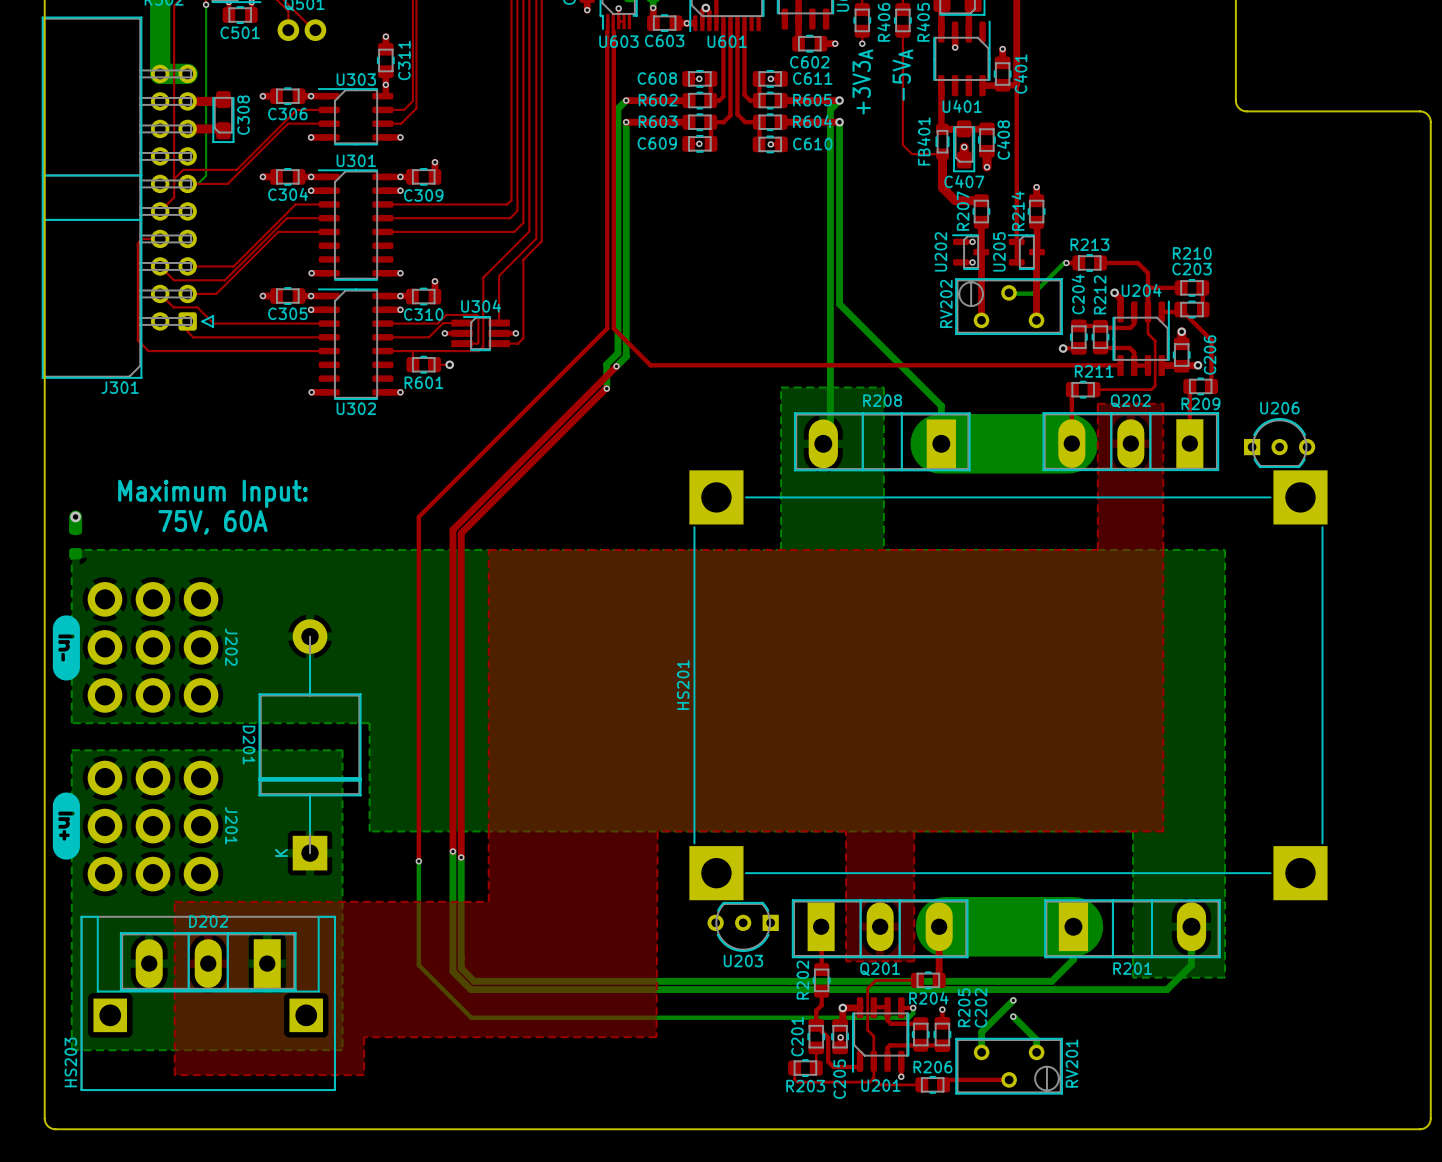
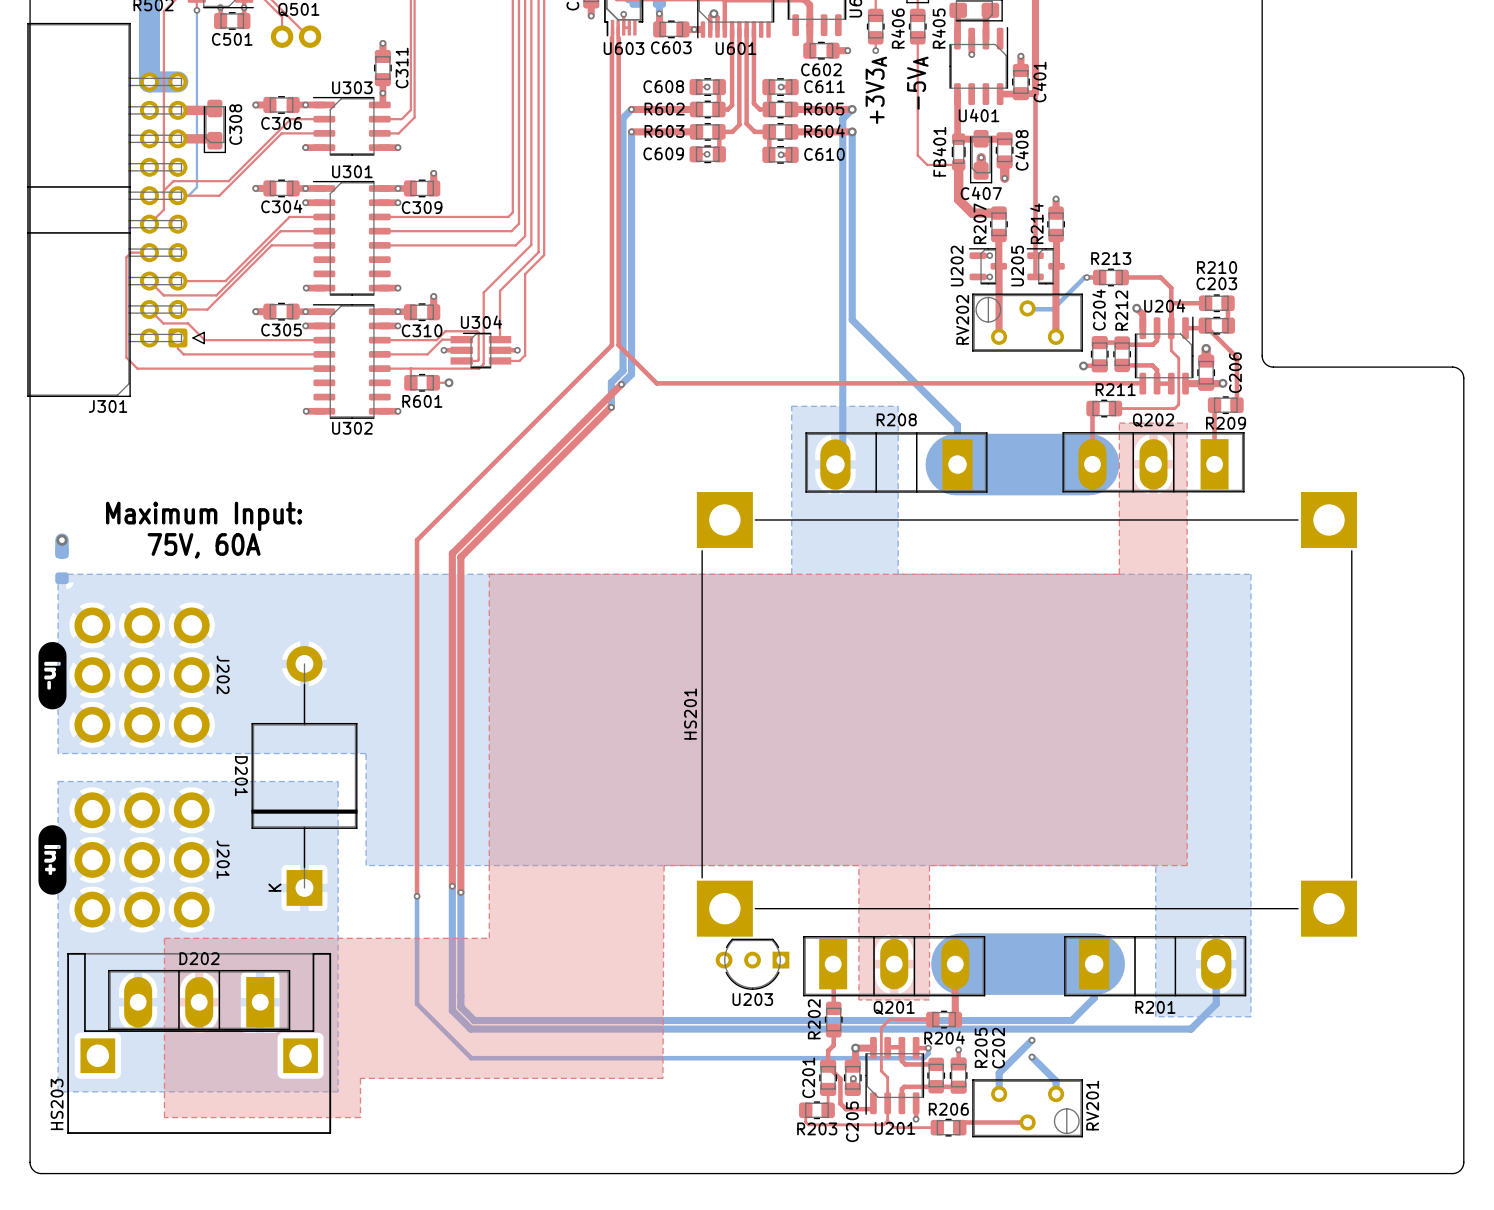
board edge: (1235, 100) (1239, 108) (1245, 111) (1419, 111) (1428, 115) (1430, 122) (1430, 360) -> (1262, 109) (1262, 355) (1264, 362) (1273, 367) (1453, 367) (1461, 371) (1463, 378)
U206: (1279, 443) -> none

